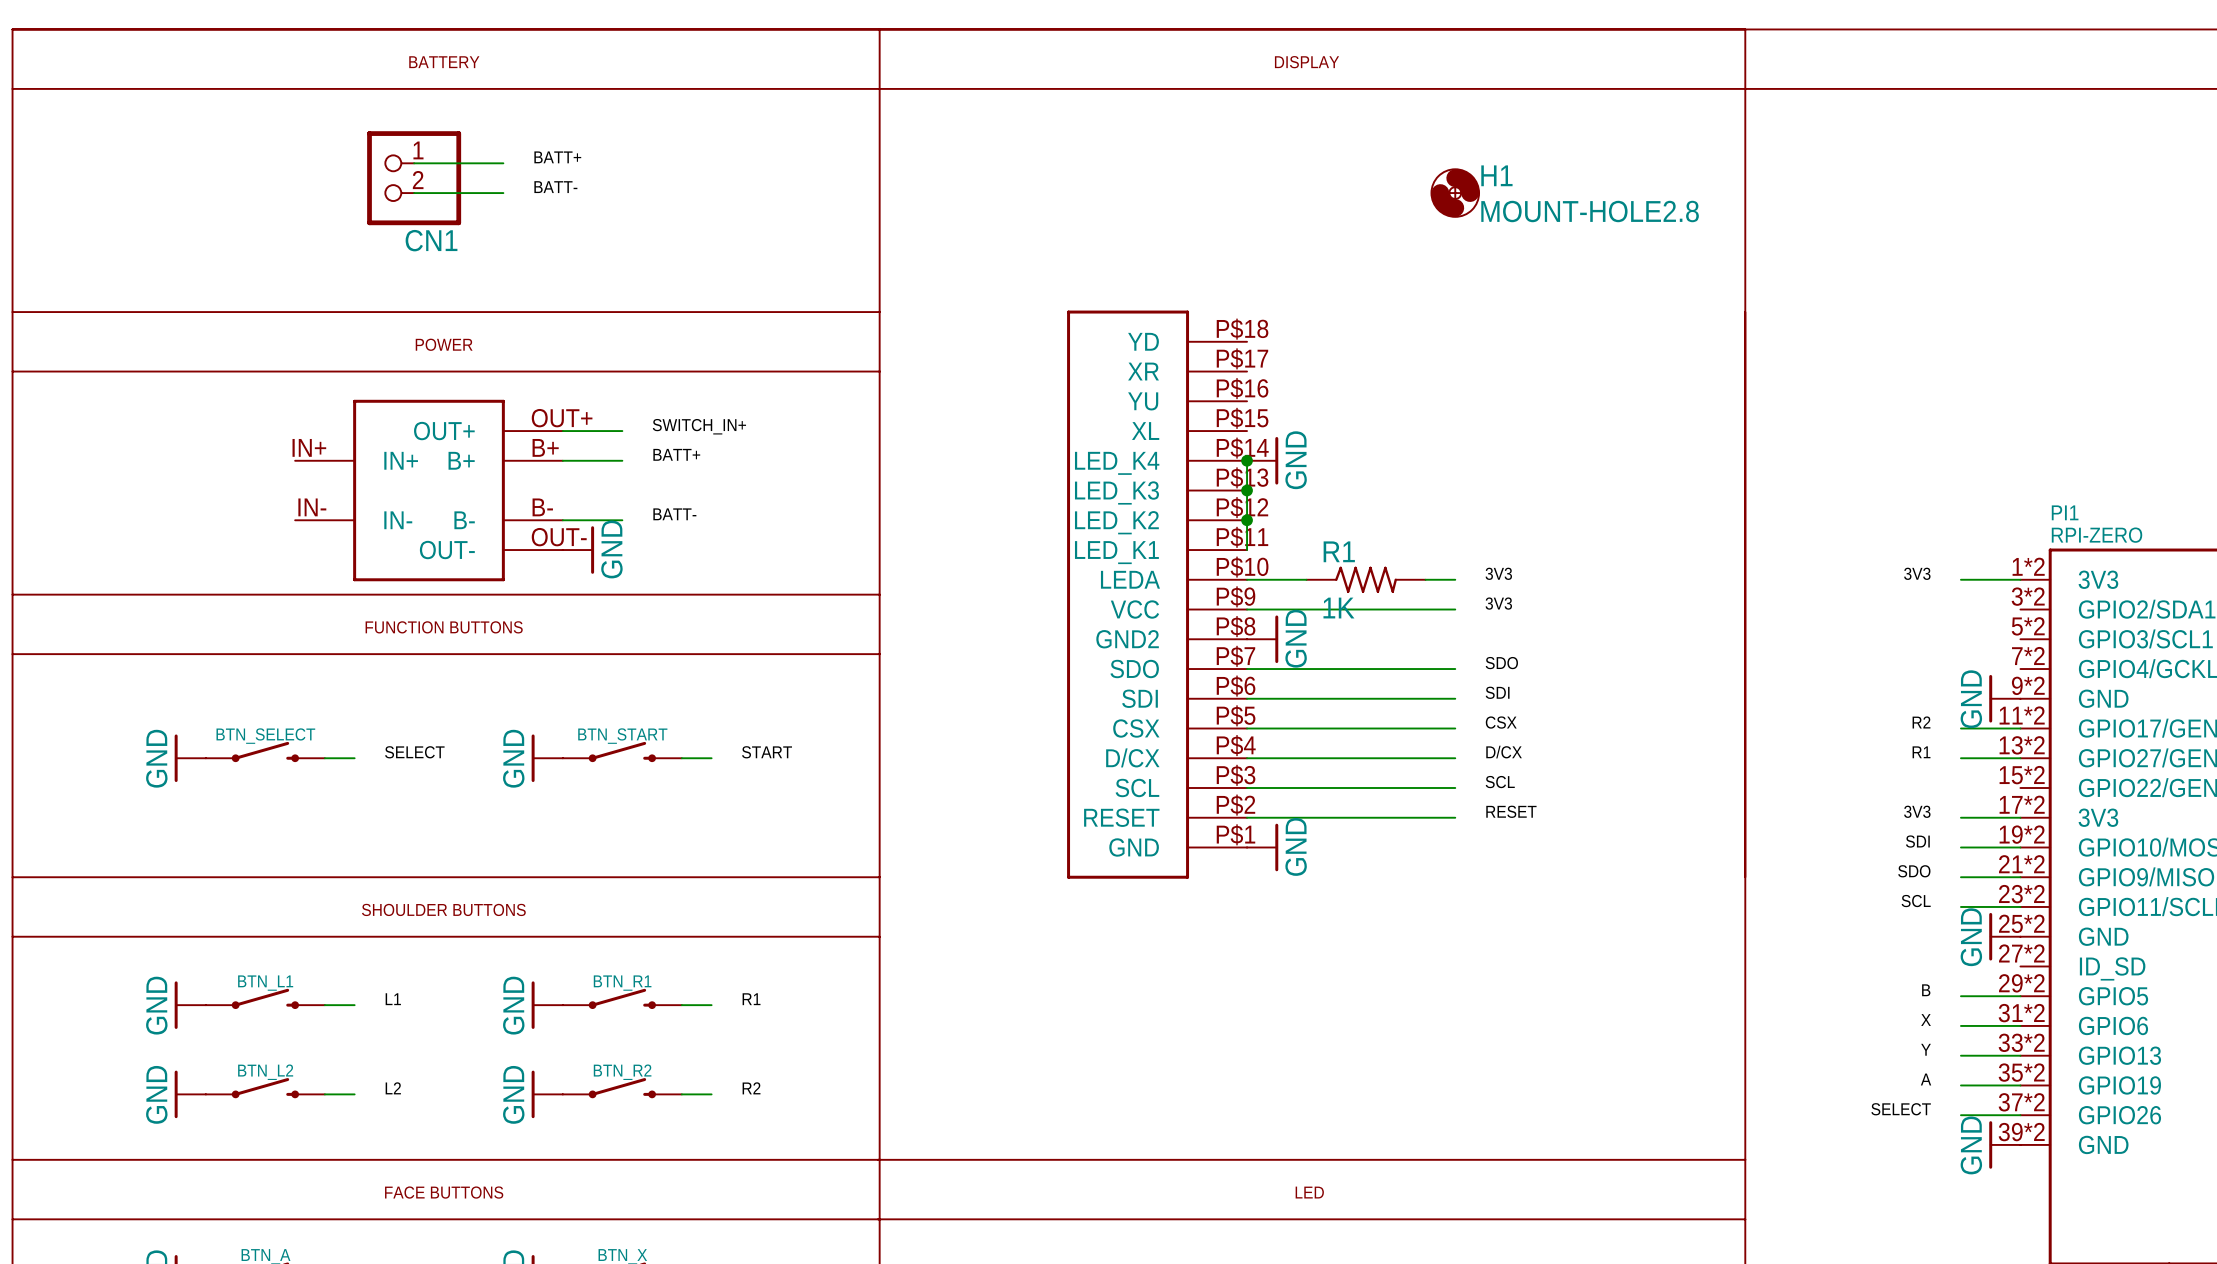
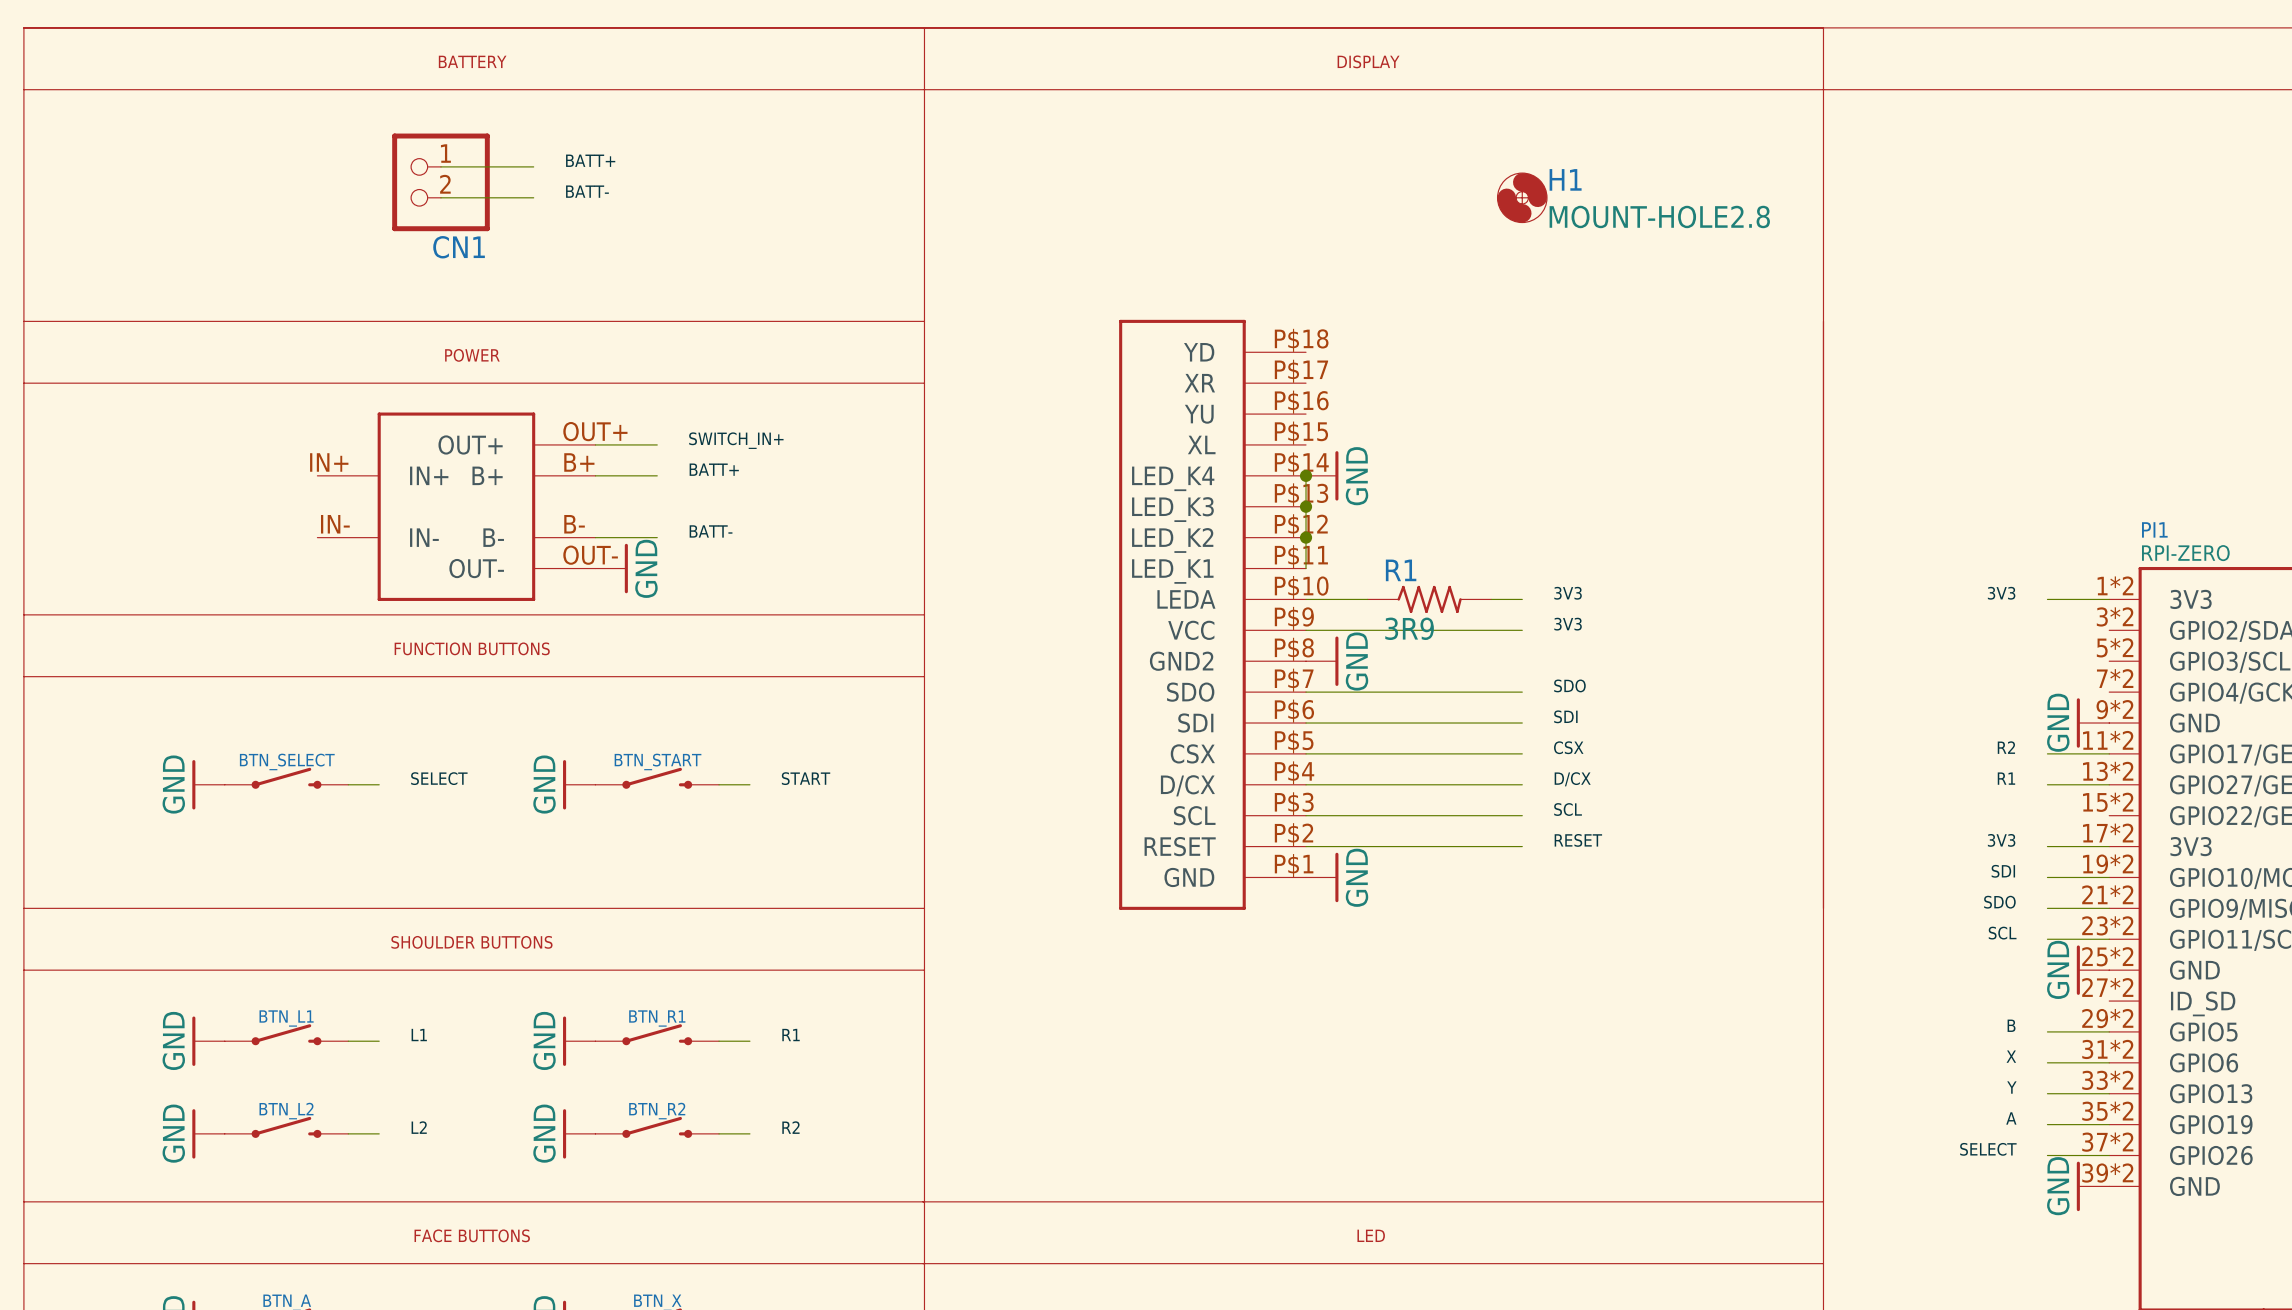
R1 value: 1K (1338, 608) -> 3R9 (1409, 628)

